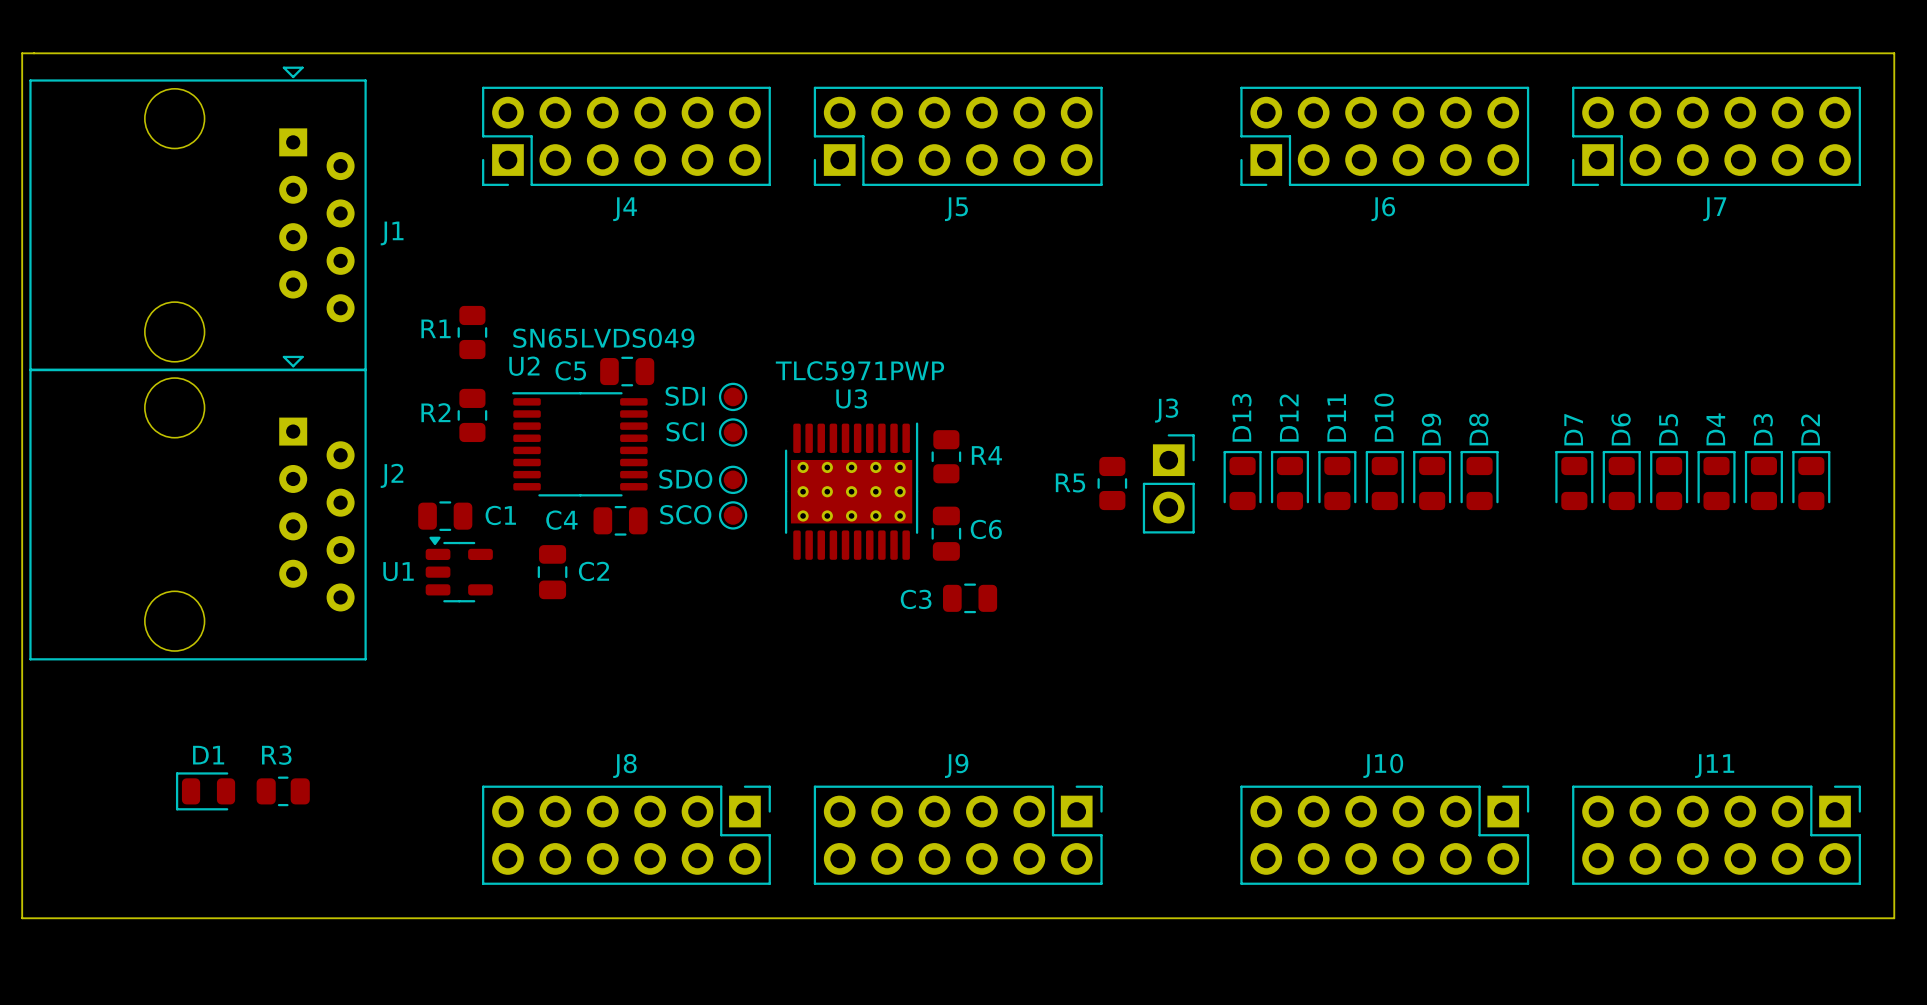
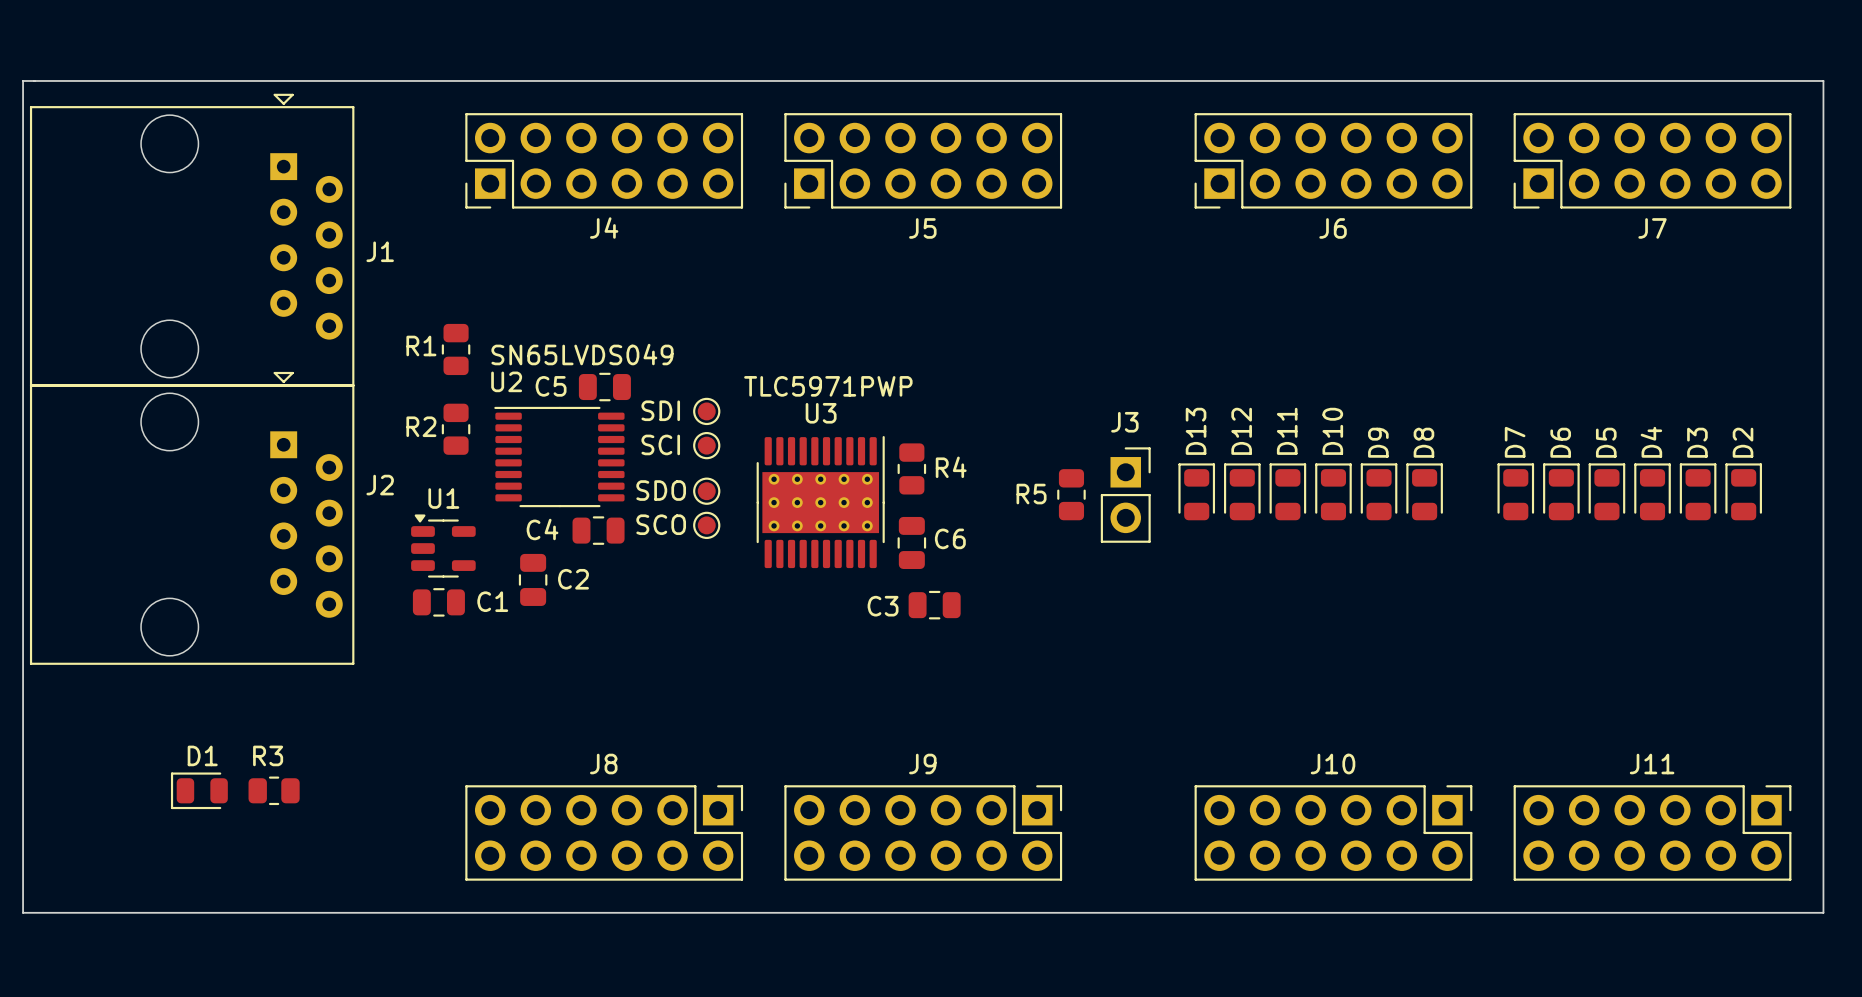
C1 position: (445, 516) -> (438, 602)
U1 position: (459, 569) -> (443, 546)
U1 name position: U1 (398, 571) -> U1 (443, 498)

